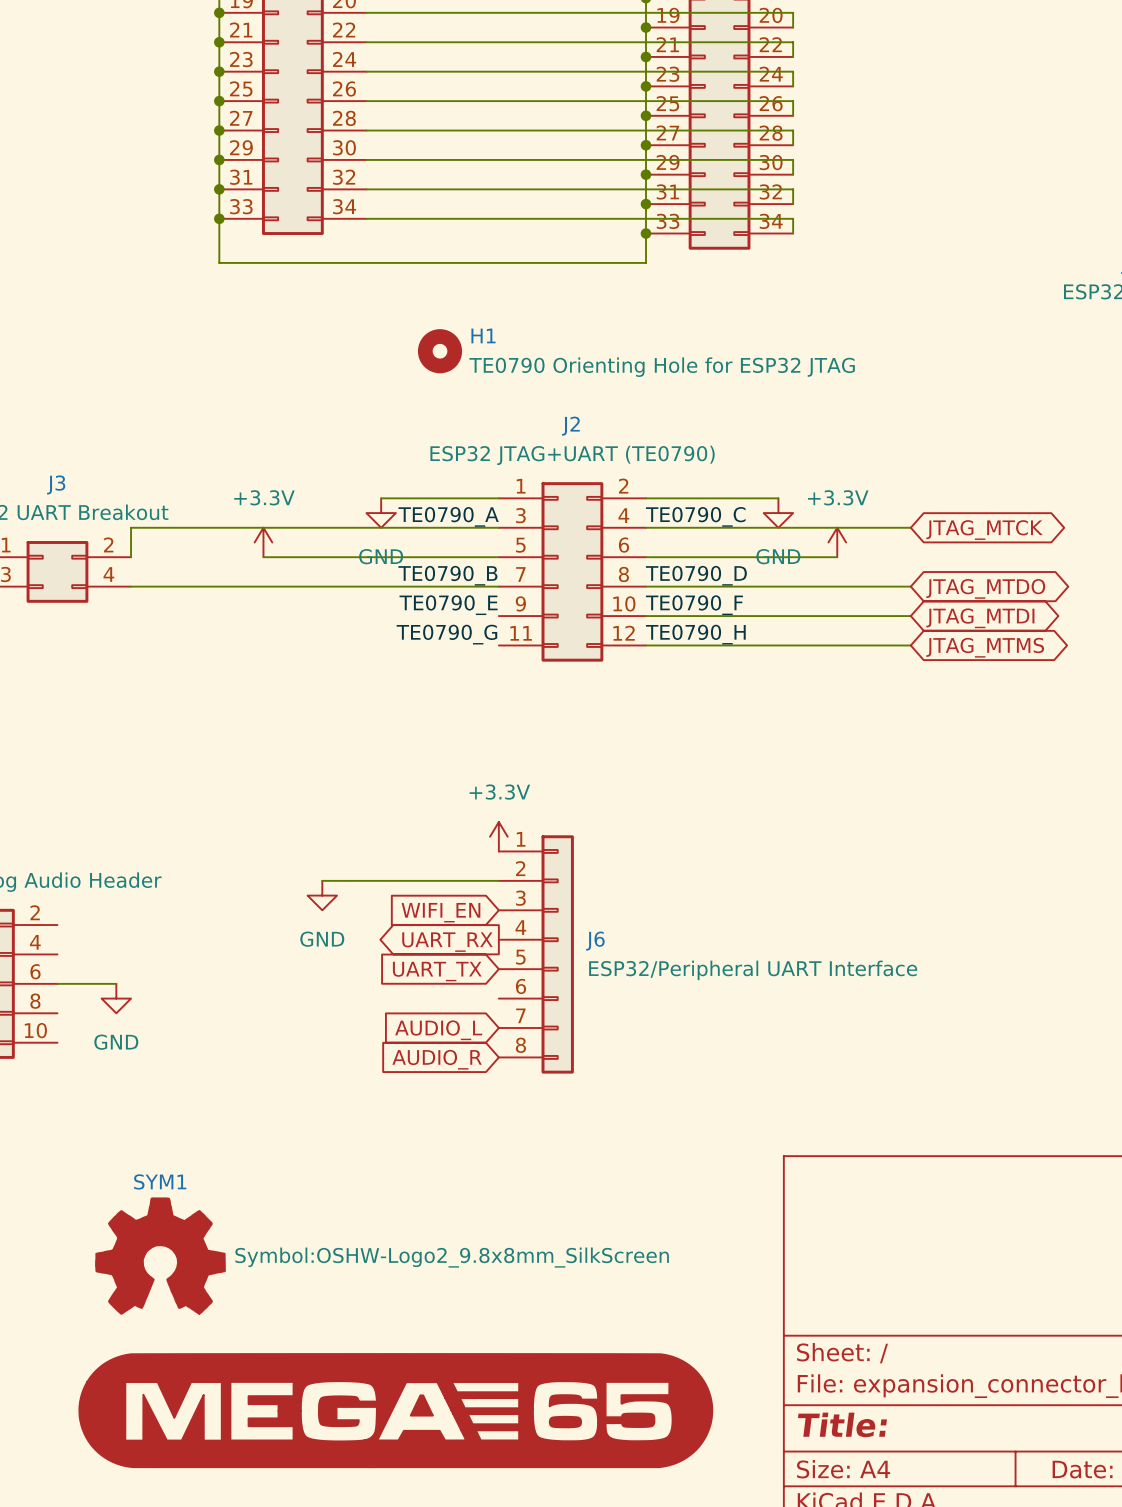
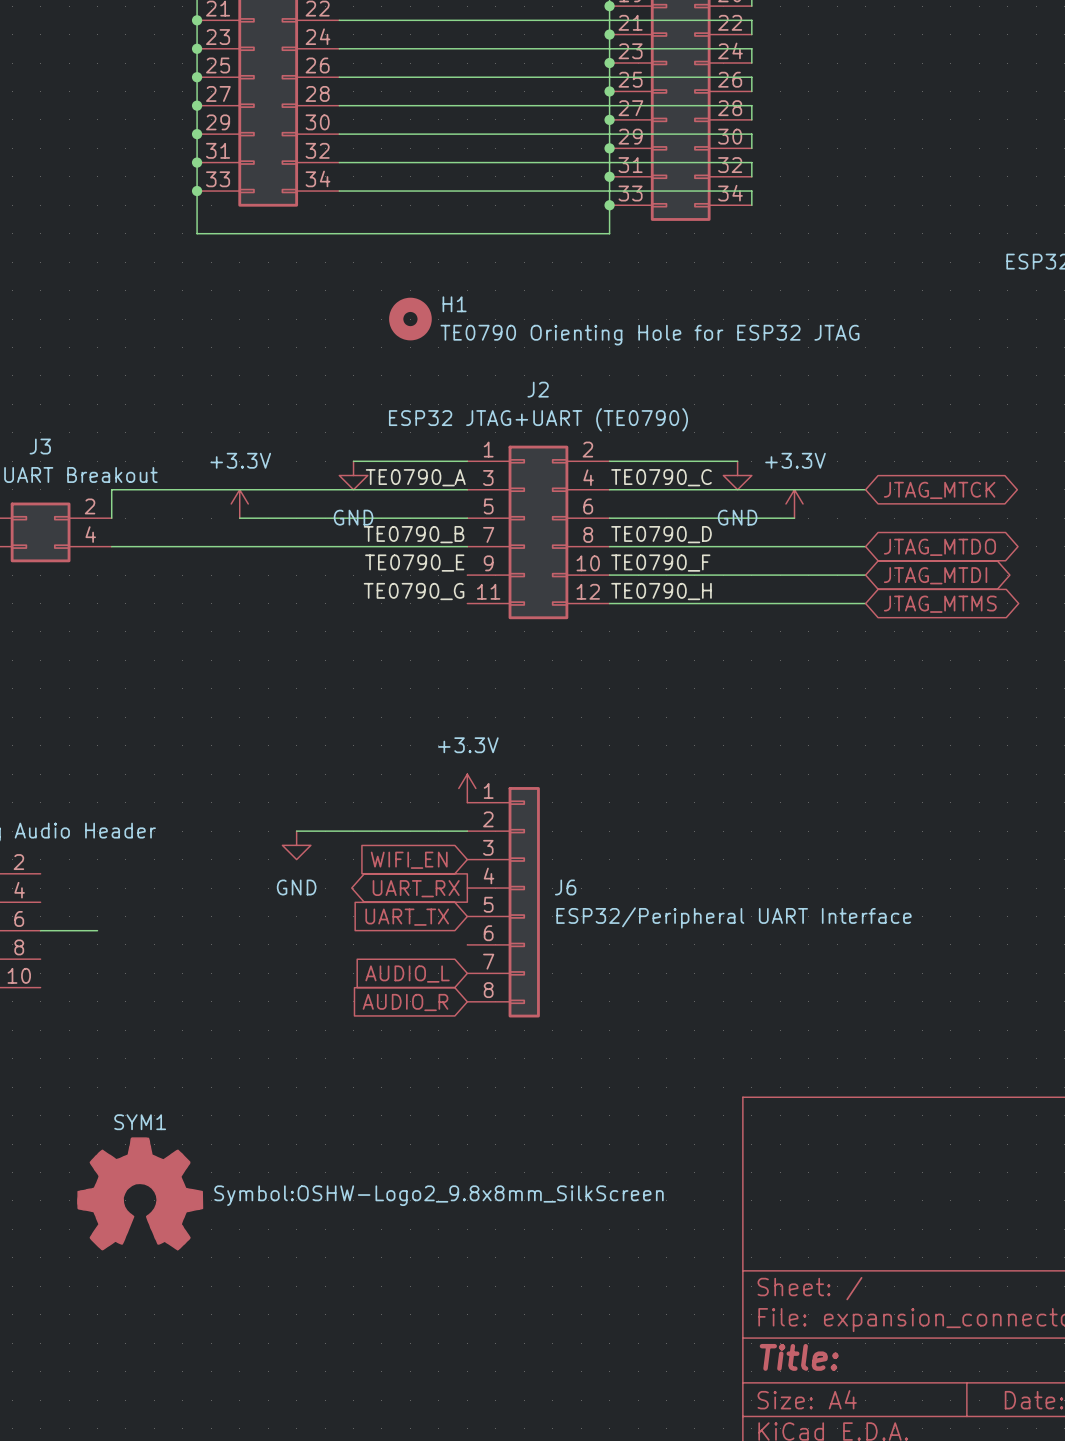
power symbol: GND (116, 998) -> none
part: (395, 1410) -> none

